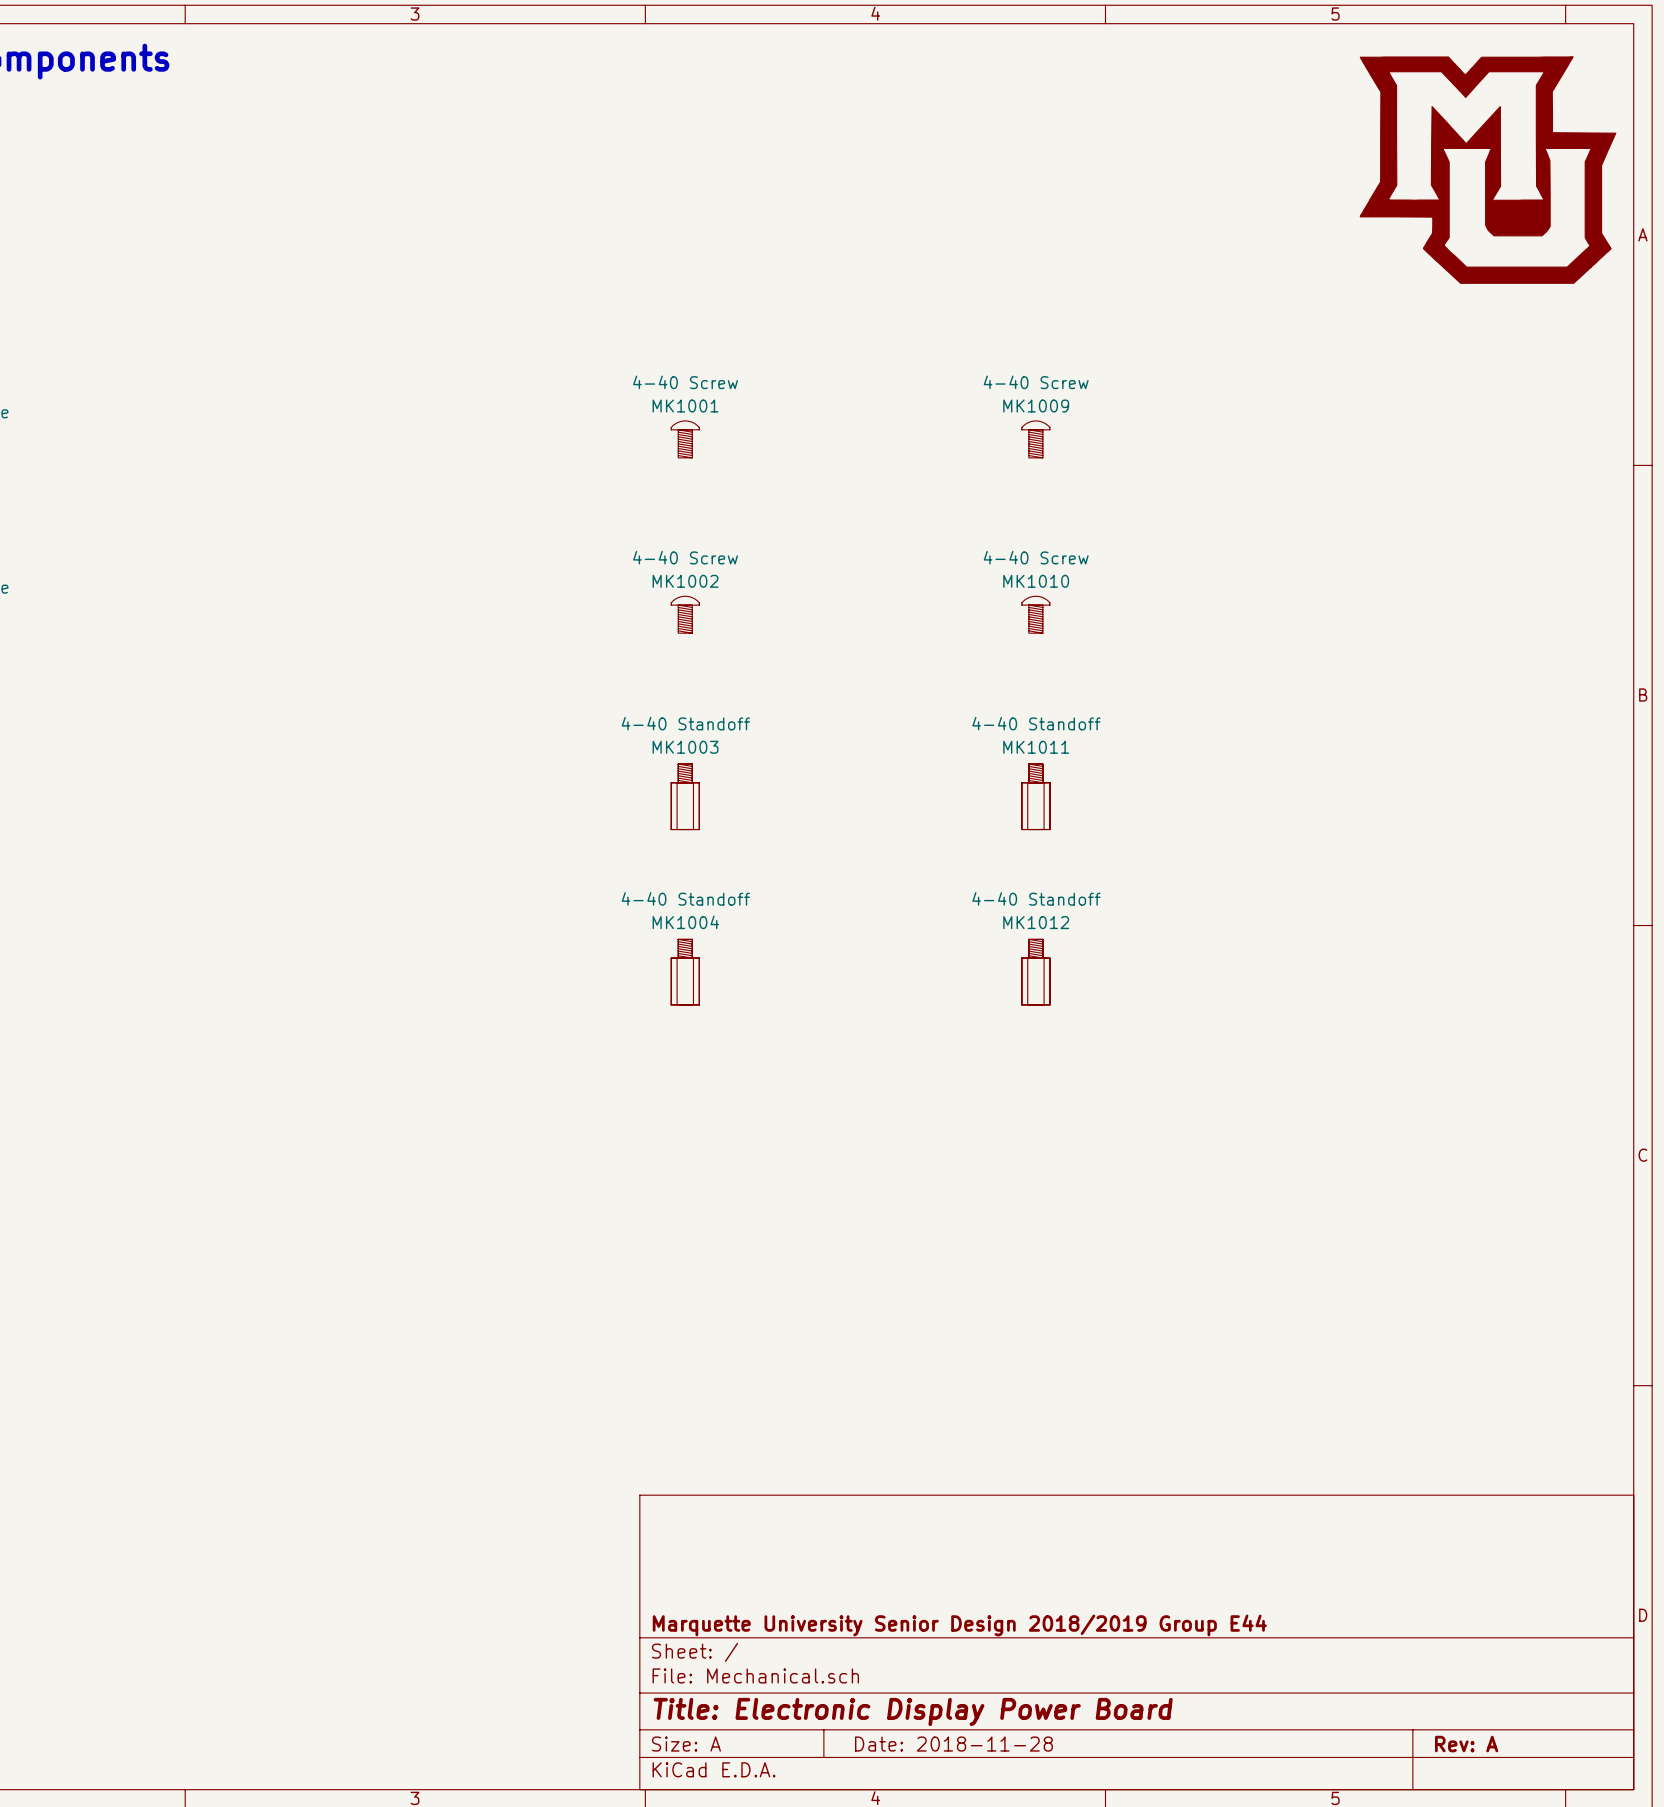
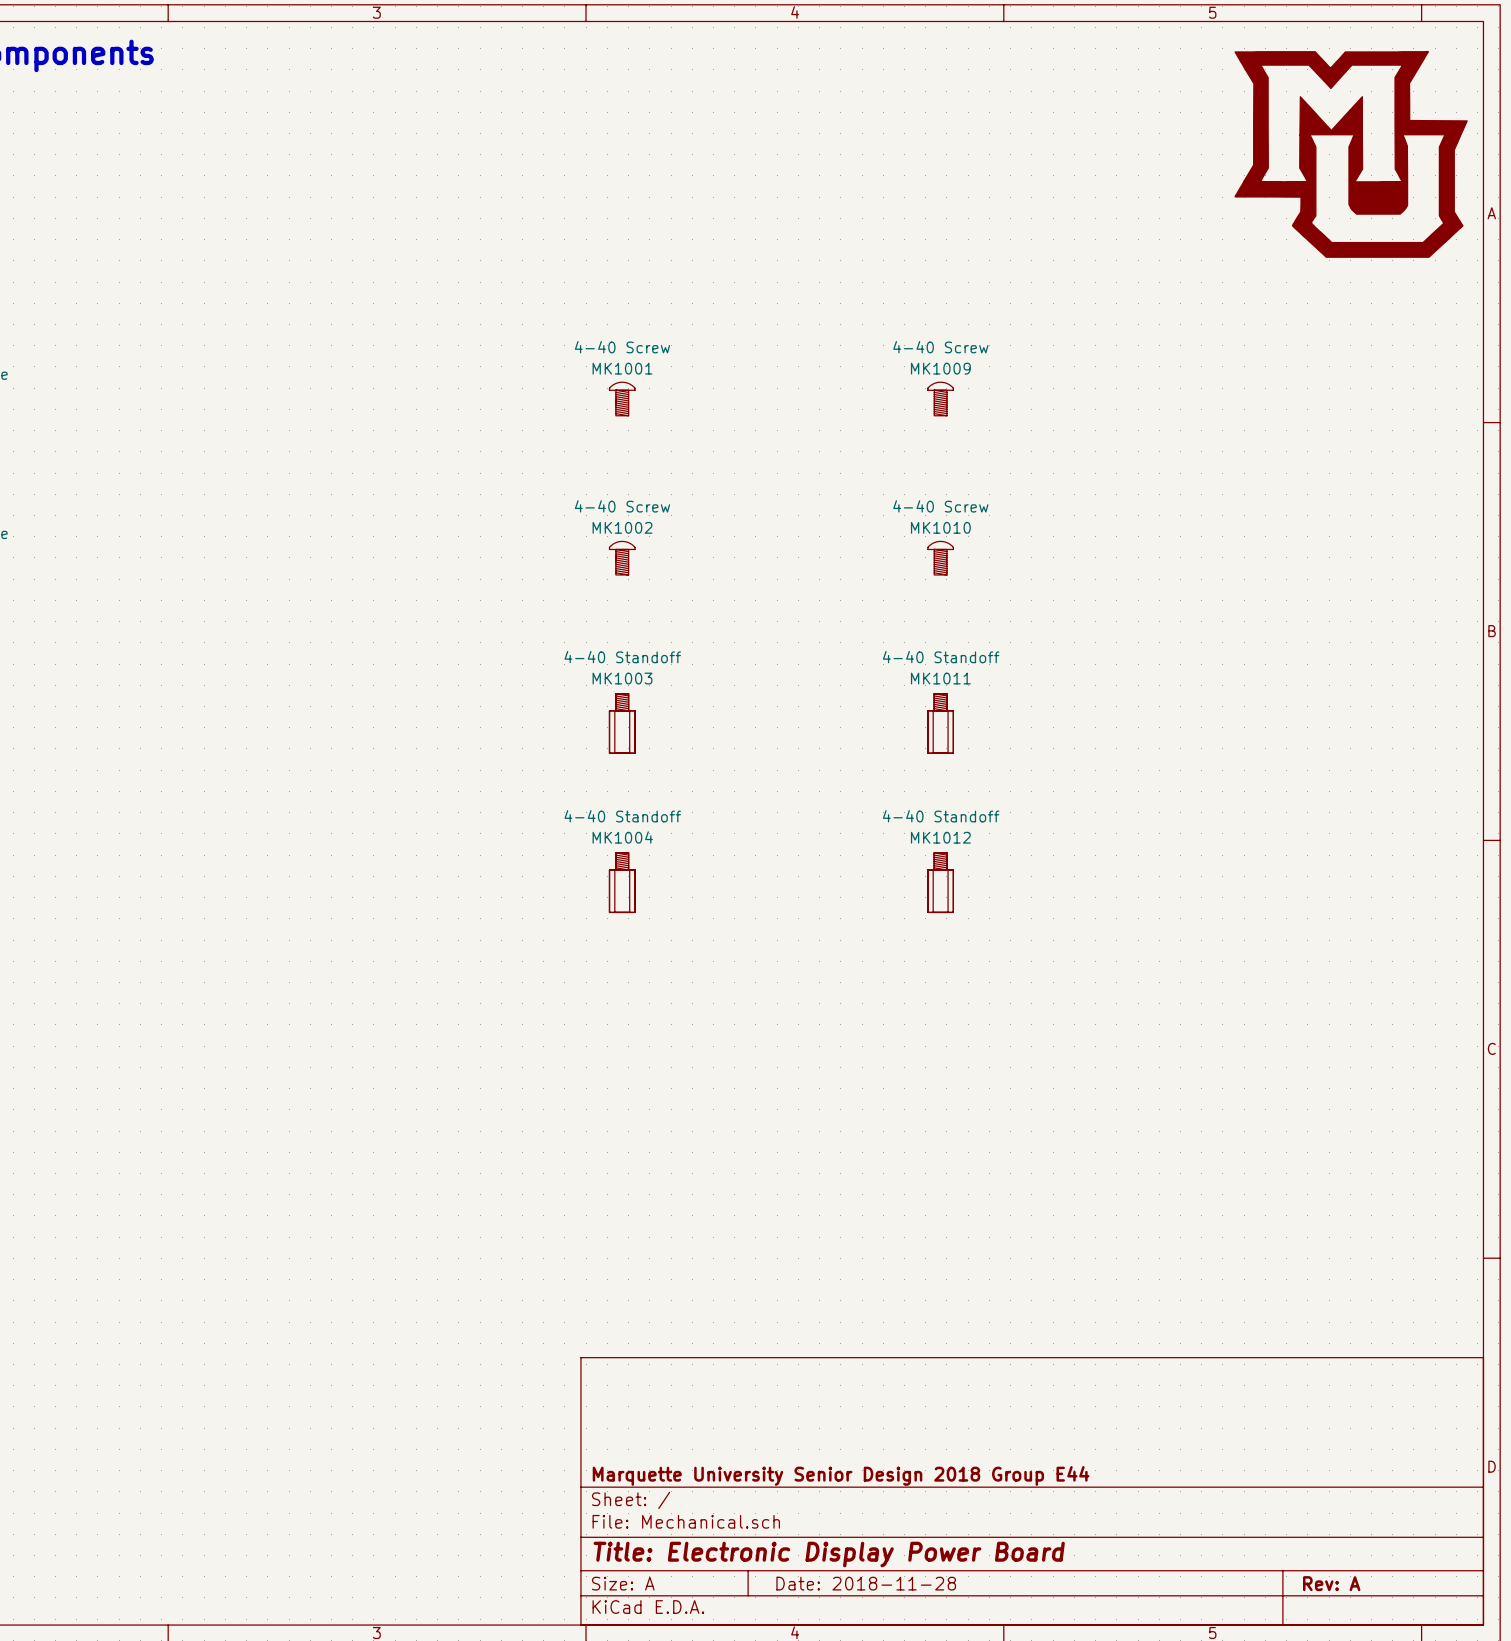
title block: Marquette University Senior Design 2018/2019 Group E44 (959, 1625) -> Marquette University Senior Design 2018 Group E44 (841, 1475)

